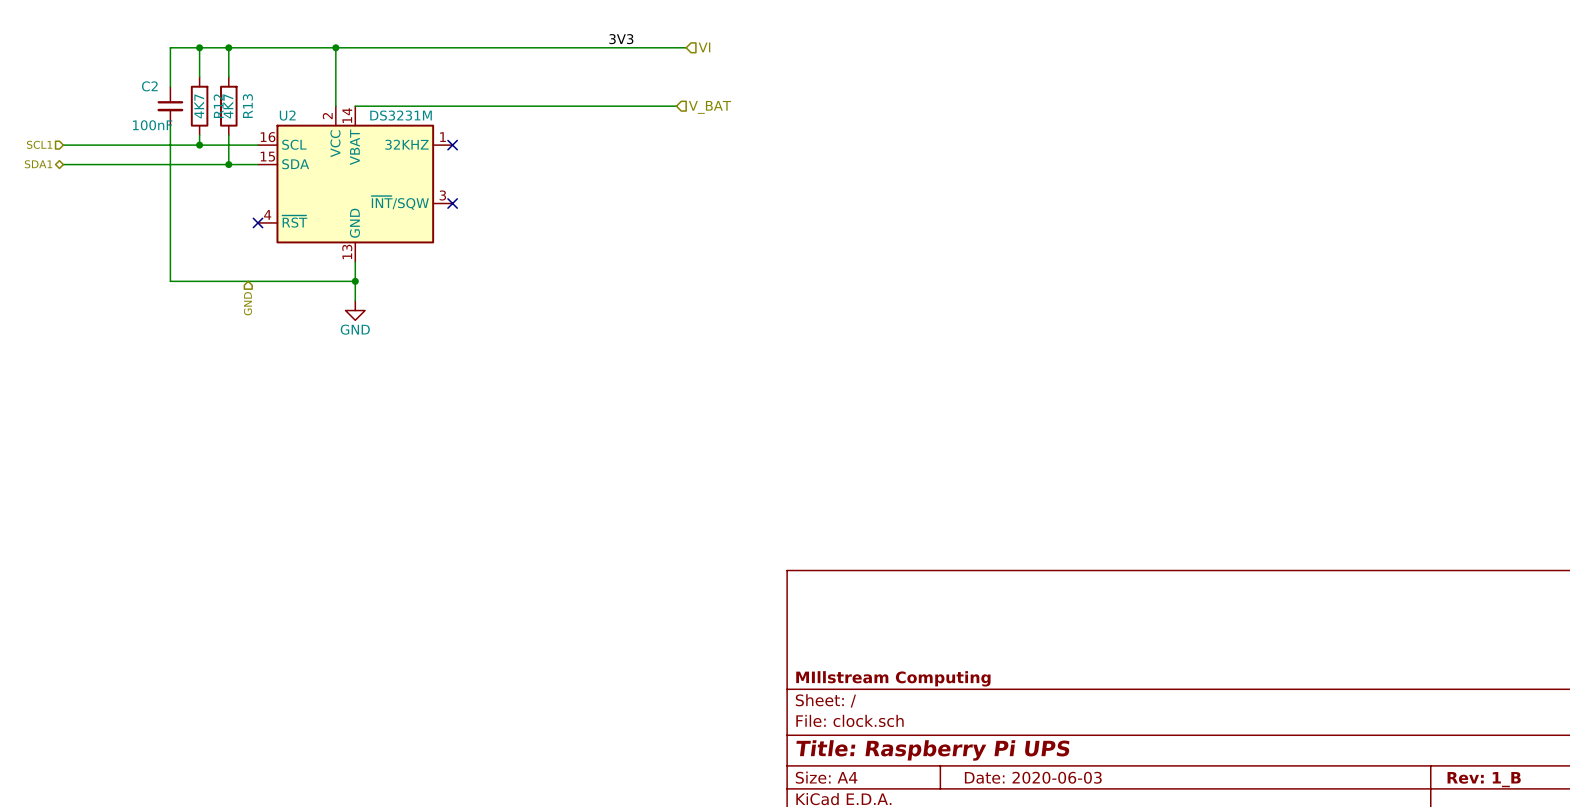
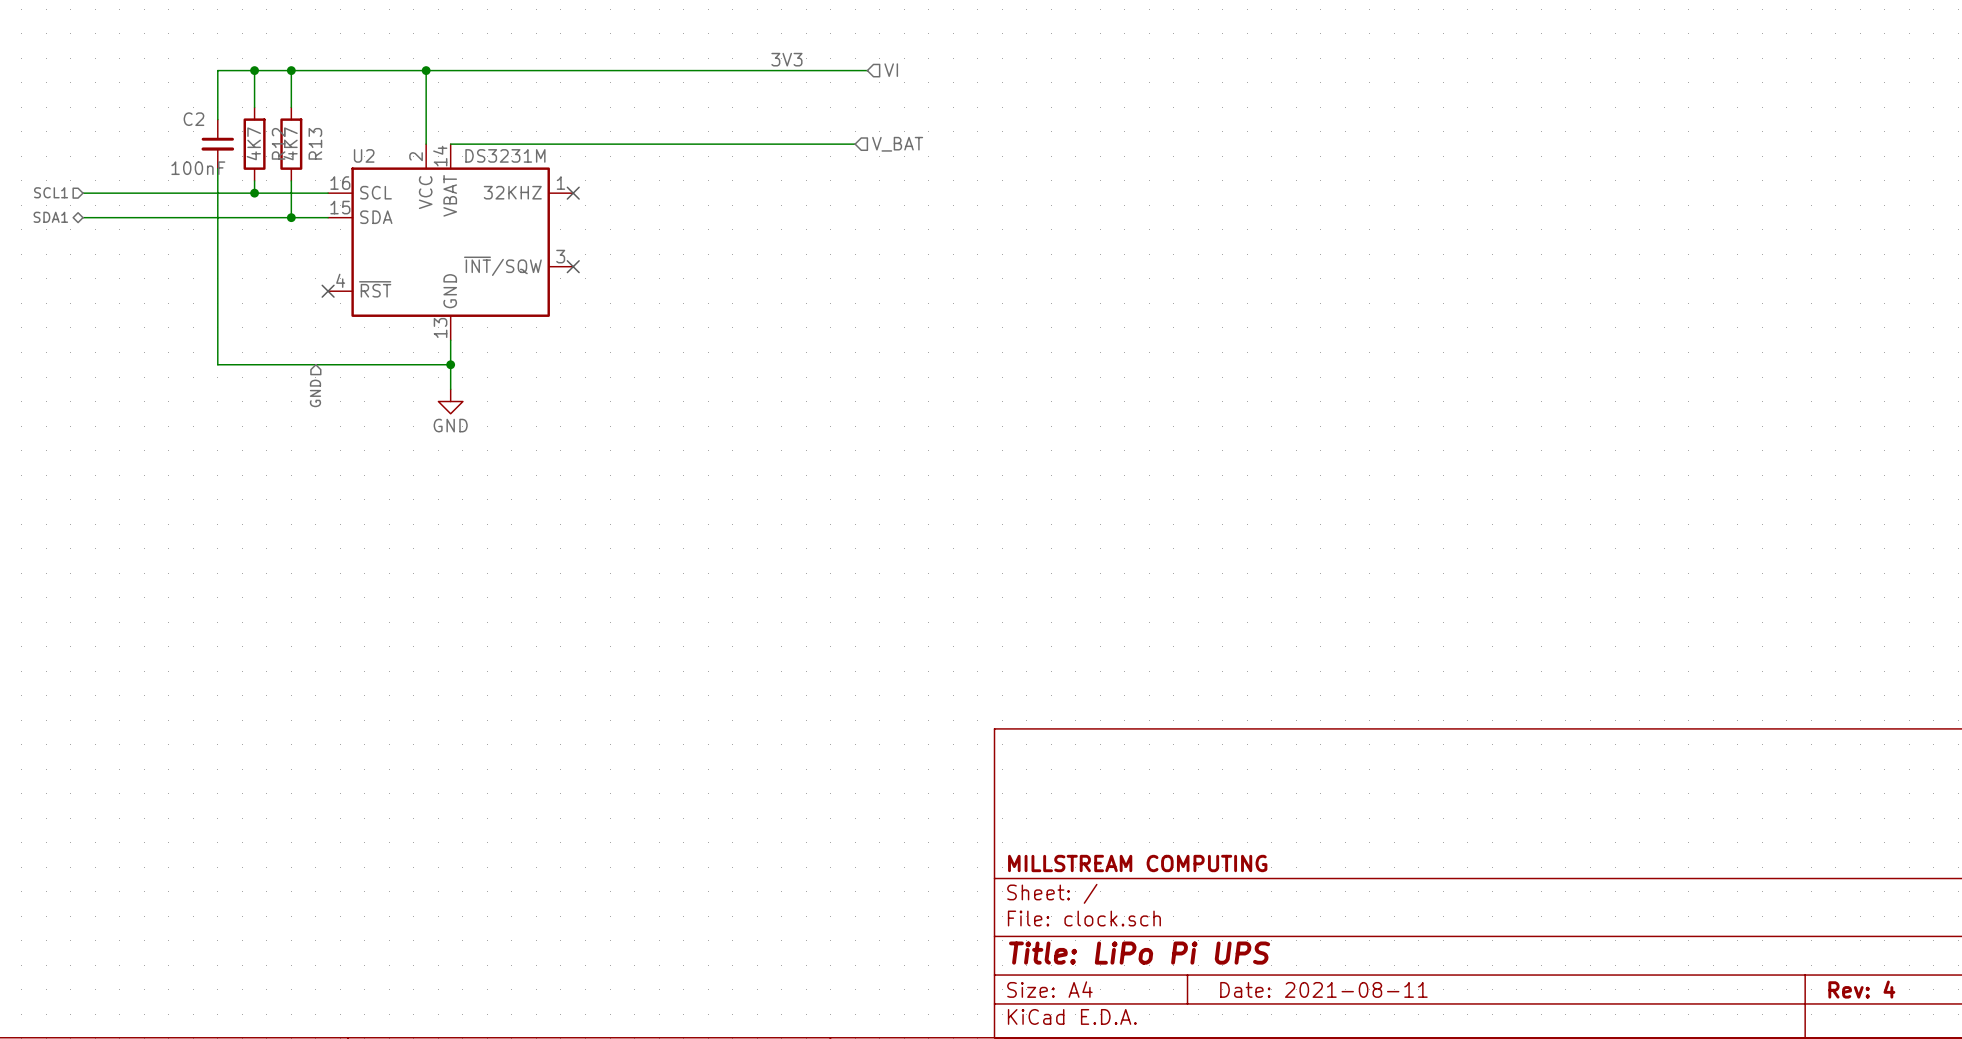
title block: MIllstream Computing (893, 678) -> MILLSTREAM COMPUTING (1137, 863)
title block: Title: Raspberry Pi UPS (932, 750) -> Title: LiPo Pi UPS (1139, 953)
title block: Date: 2020-06-03 (1033, 777) -> Date: 2021-08-11 (1323, 989)
title block: Rev: 1_B (1484, 779) -> Rev: 4 (1861, 989)

